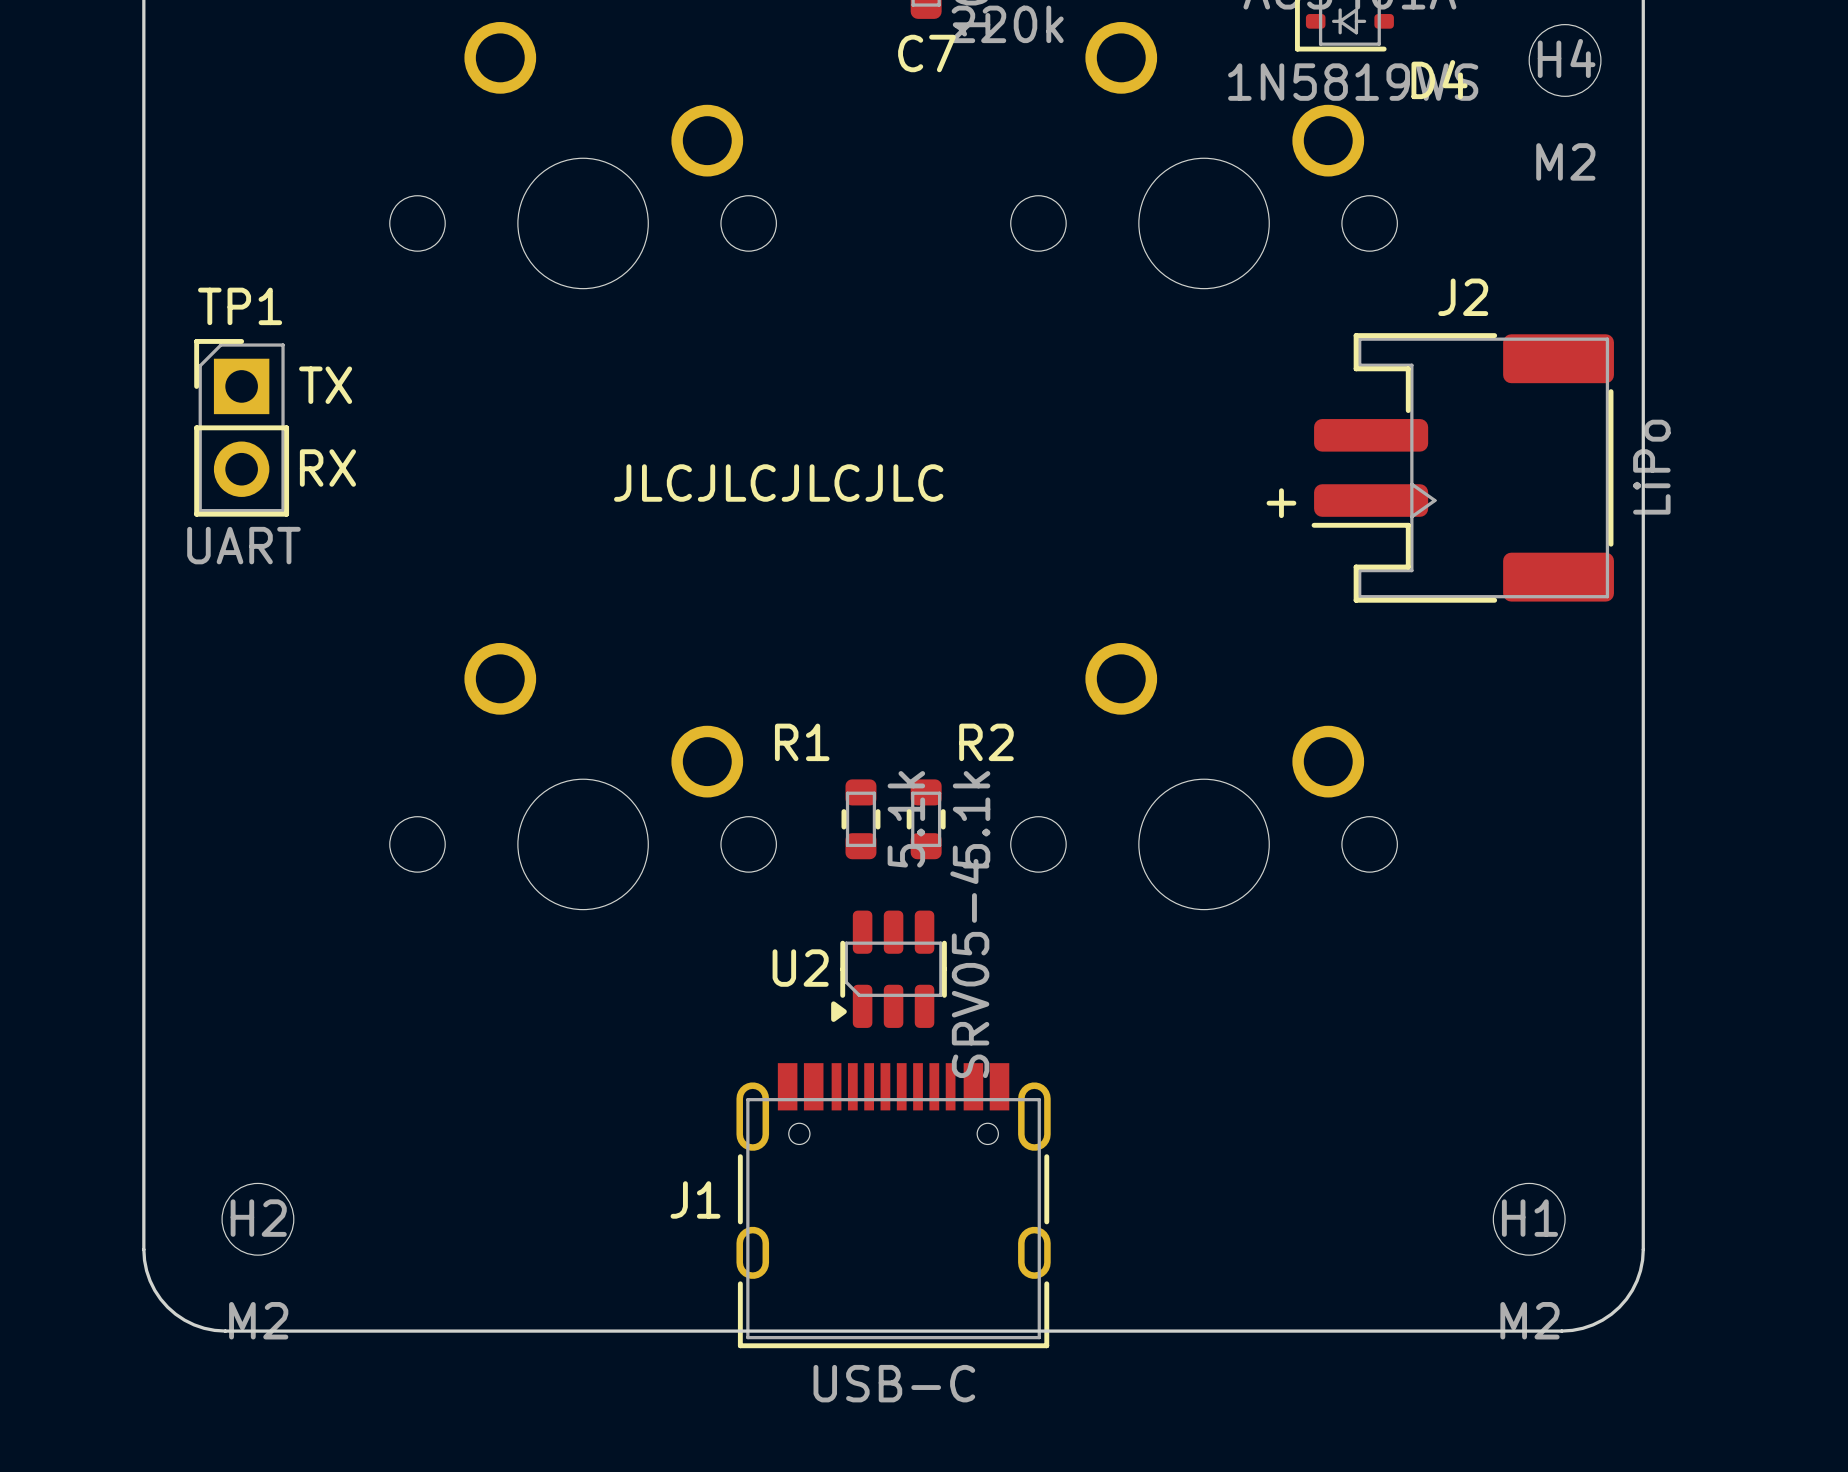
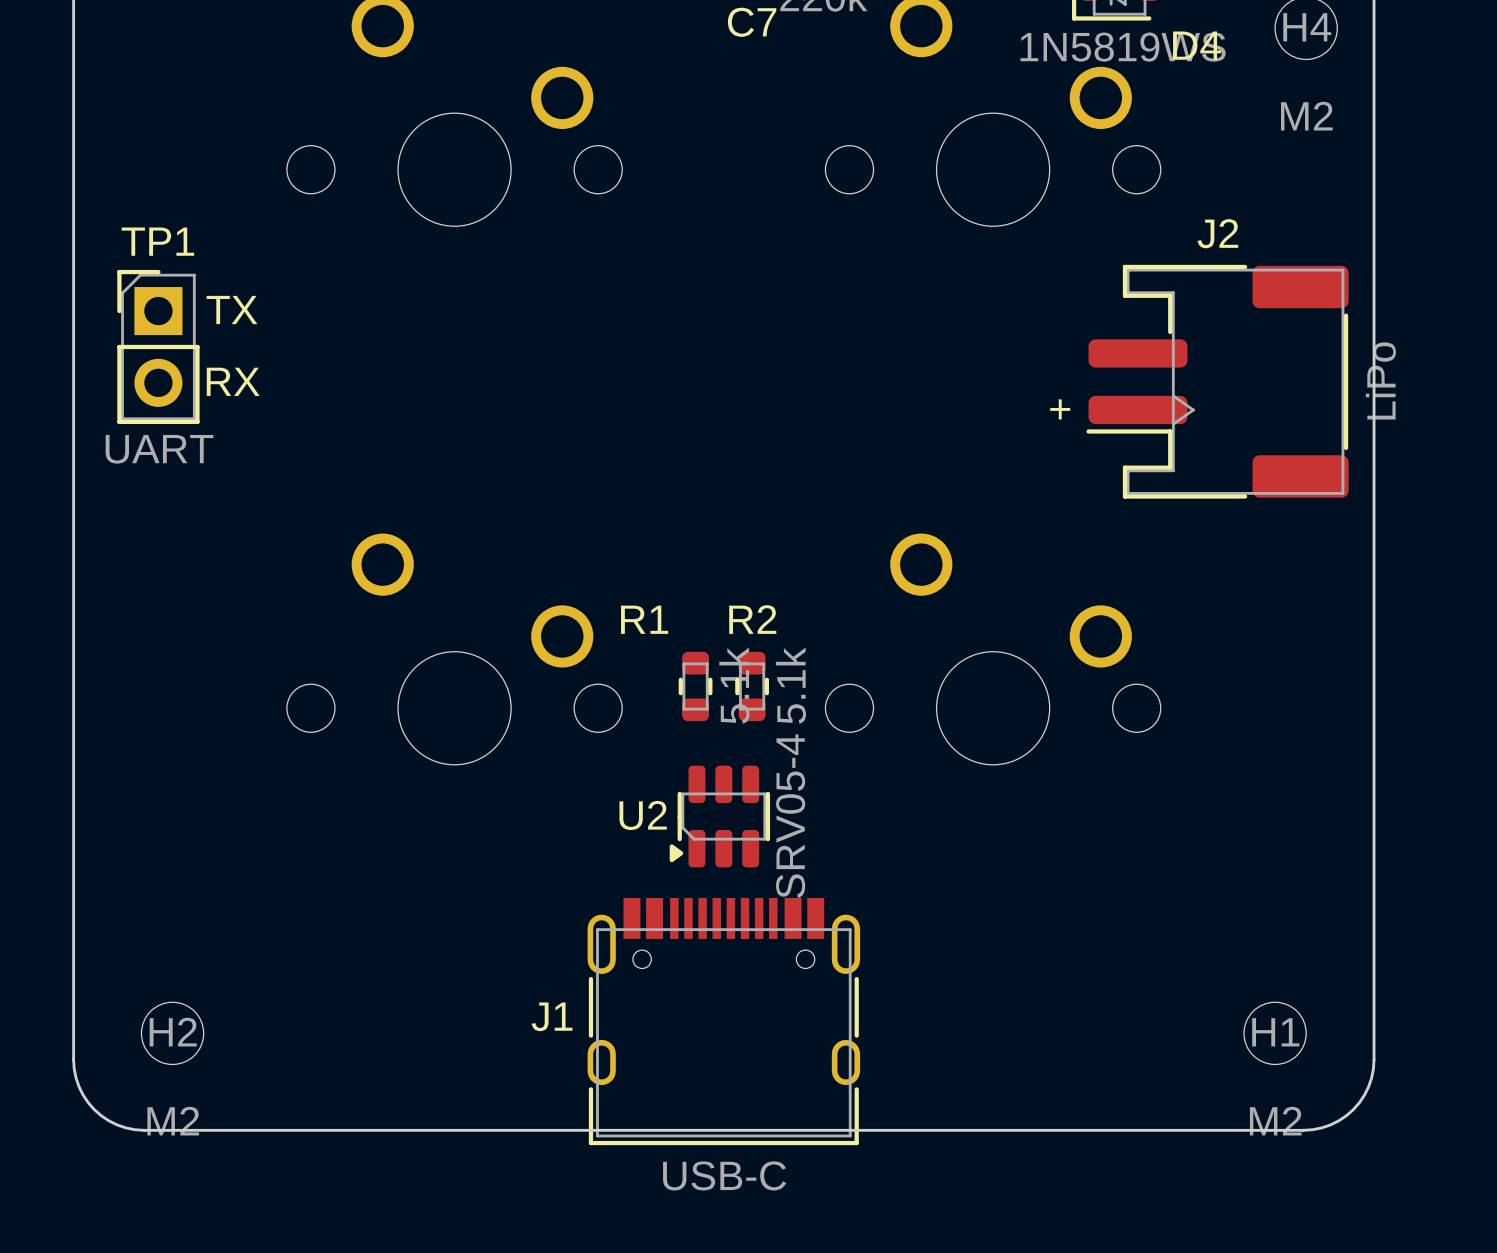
text: JLCJLCJLCJLC (778, 483) -> none
R2 name position: R2 (986, 742) -> R2 (752, 619)

